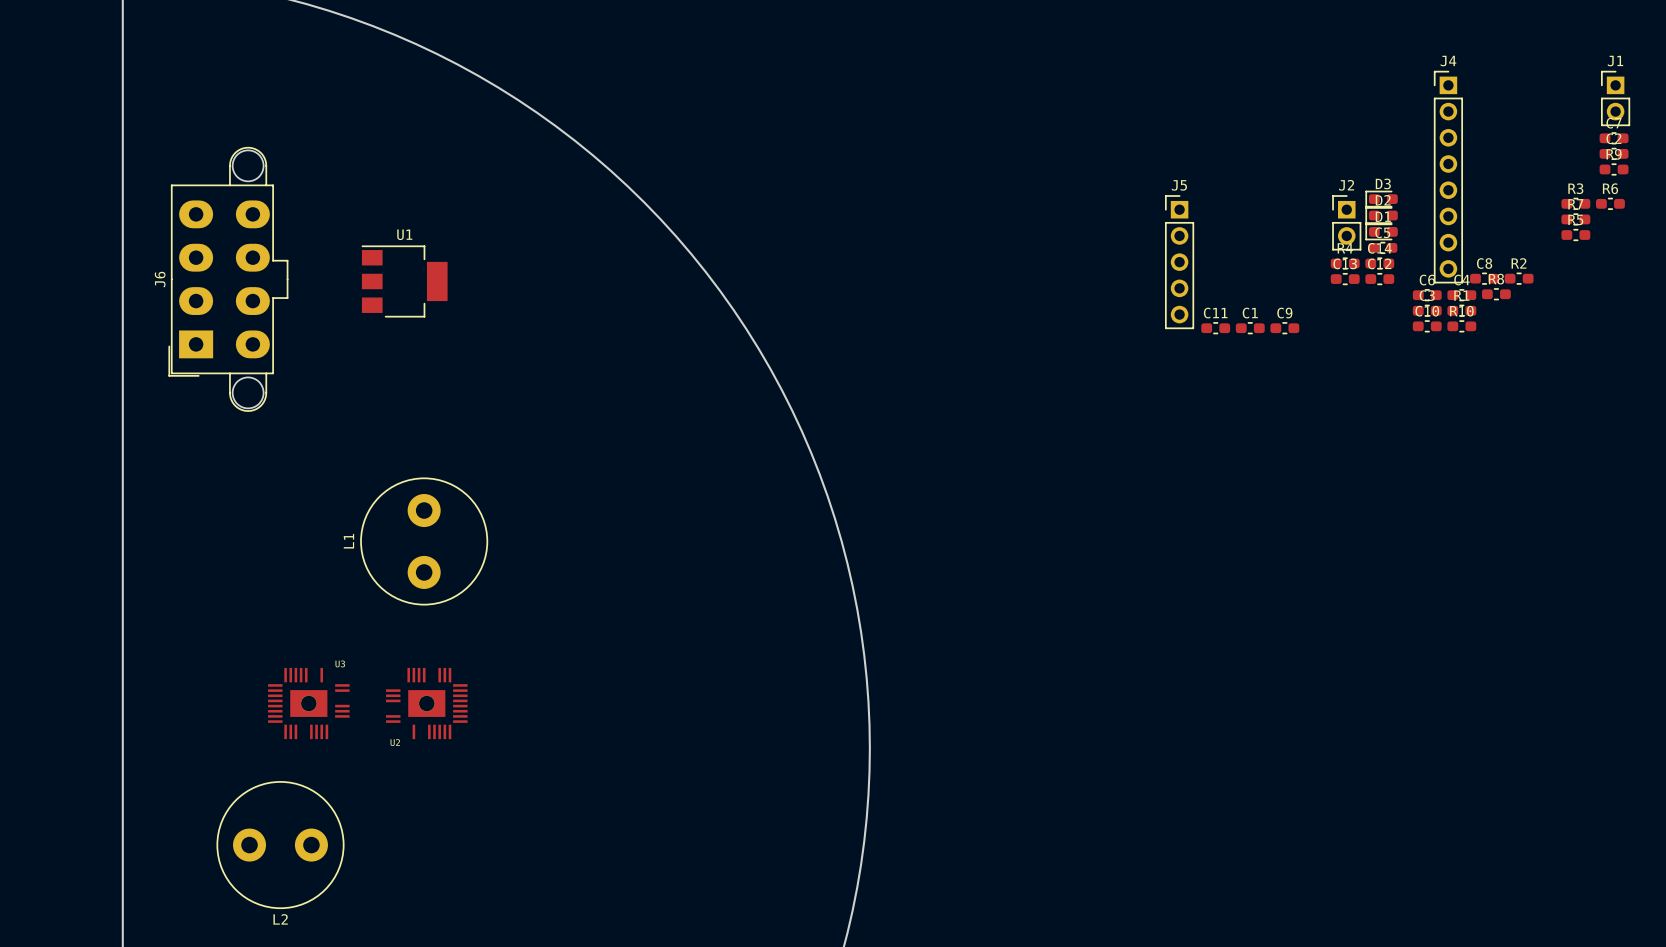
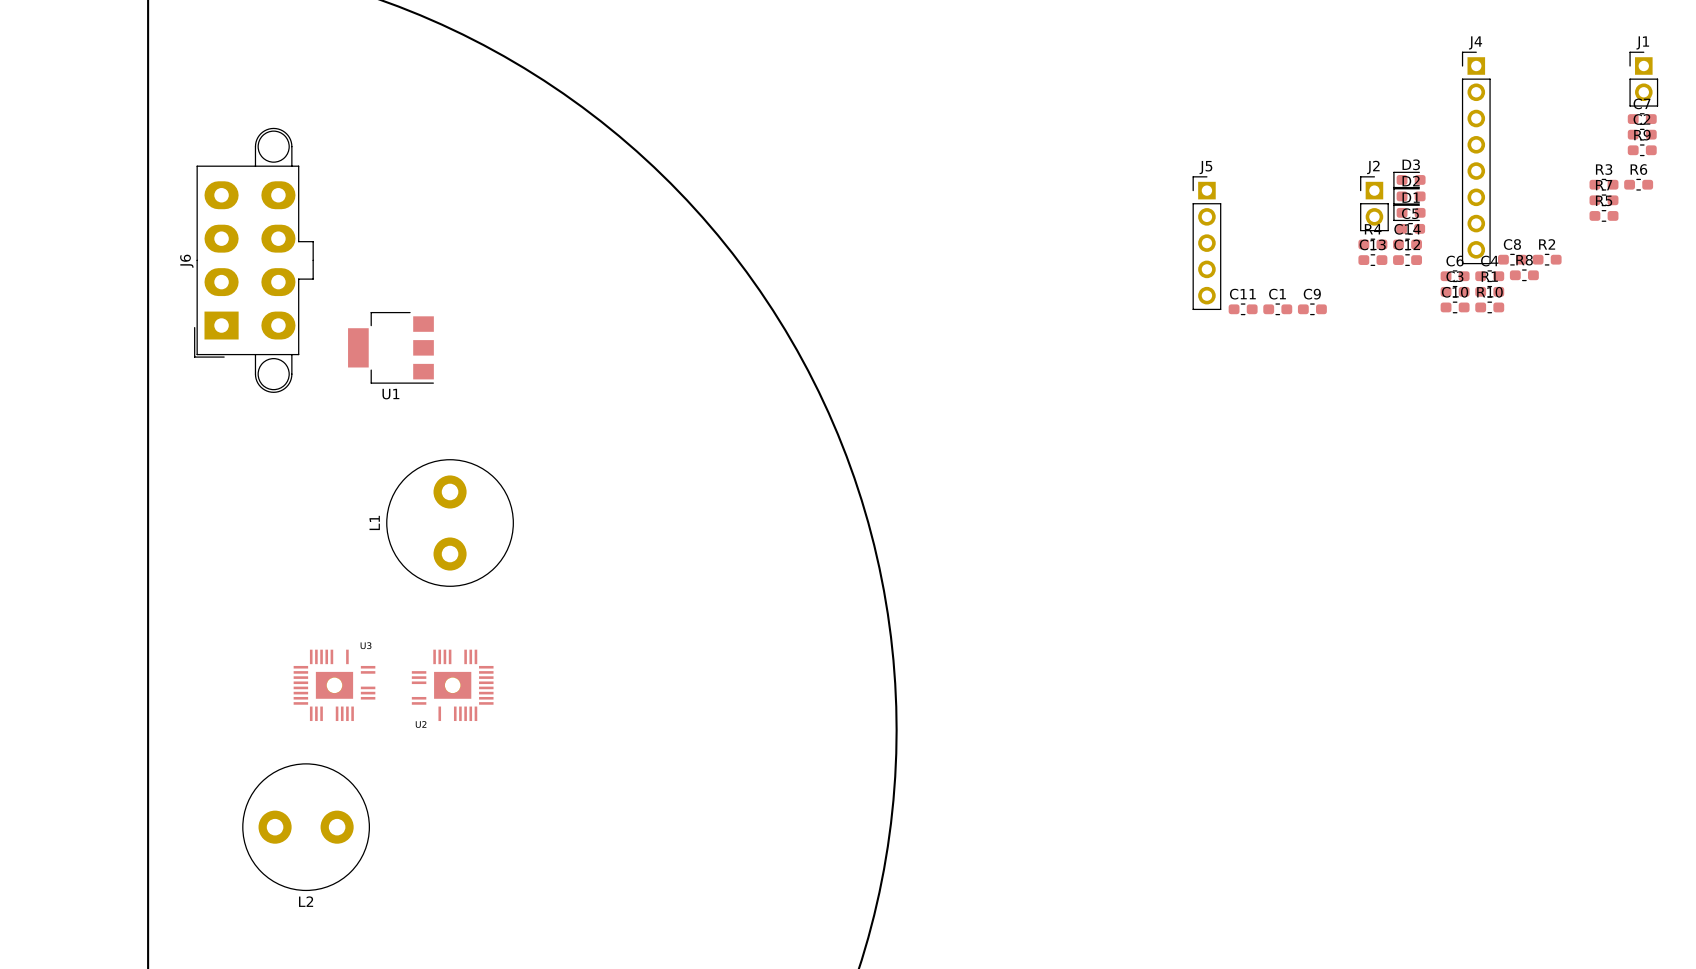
U1 rotation: 0° (404, 281) -> 180° (391, 347)
U1 position: (404, 281) -> (391, 347)

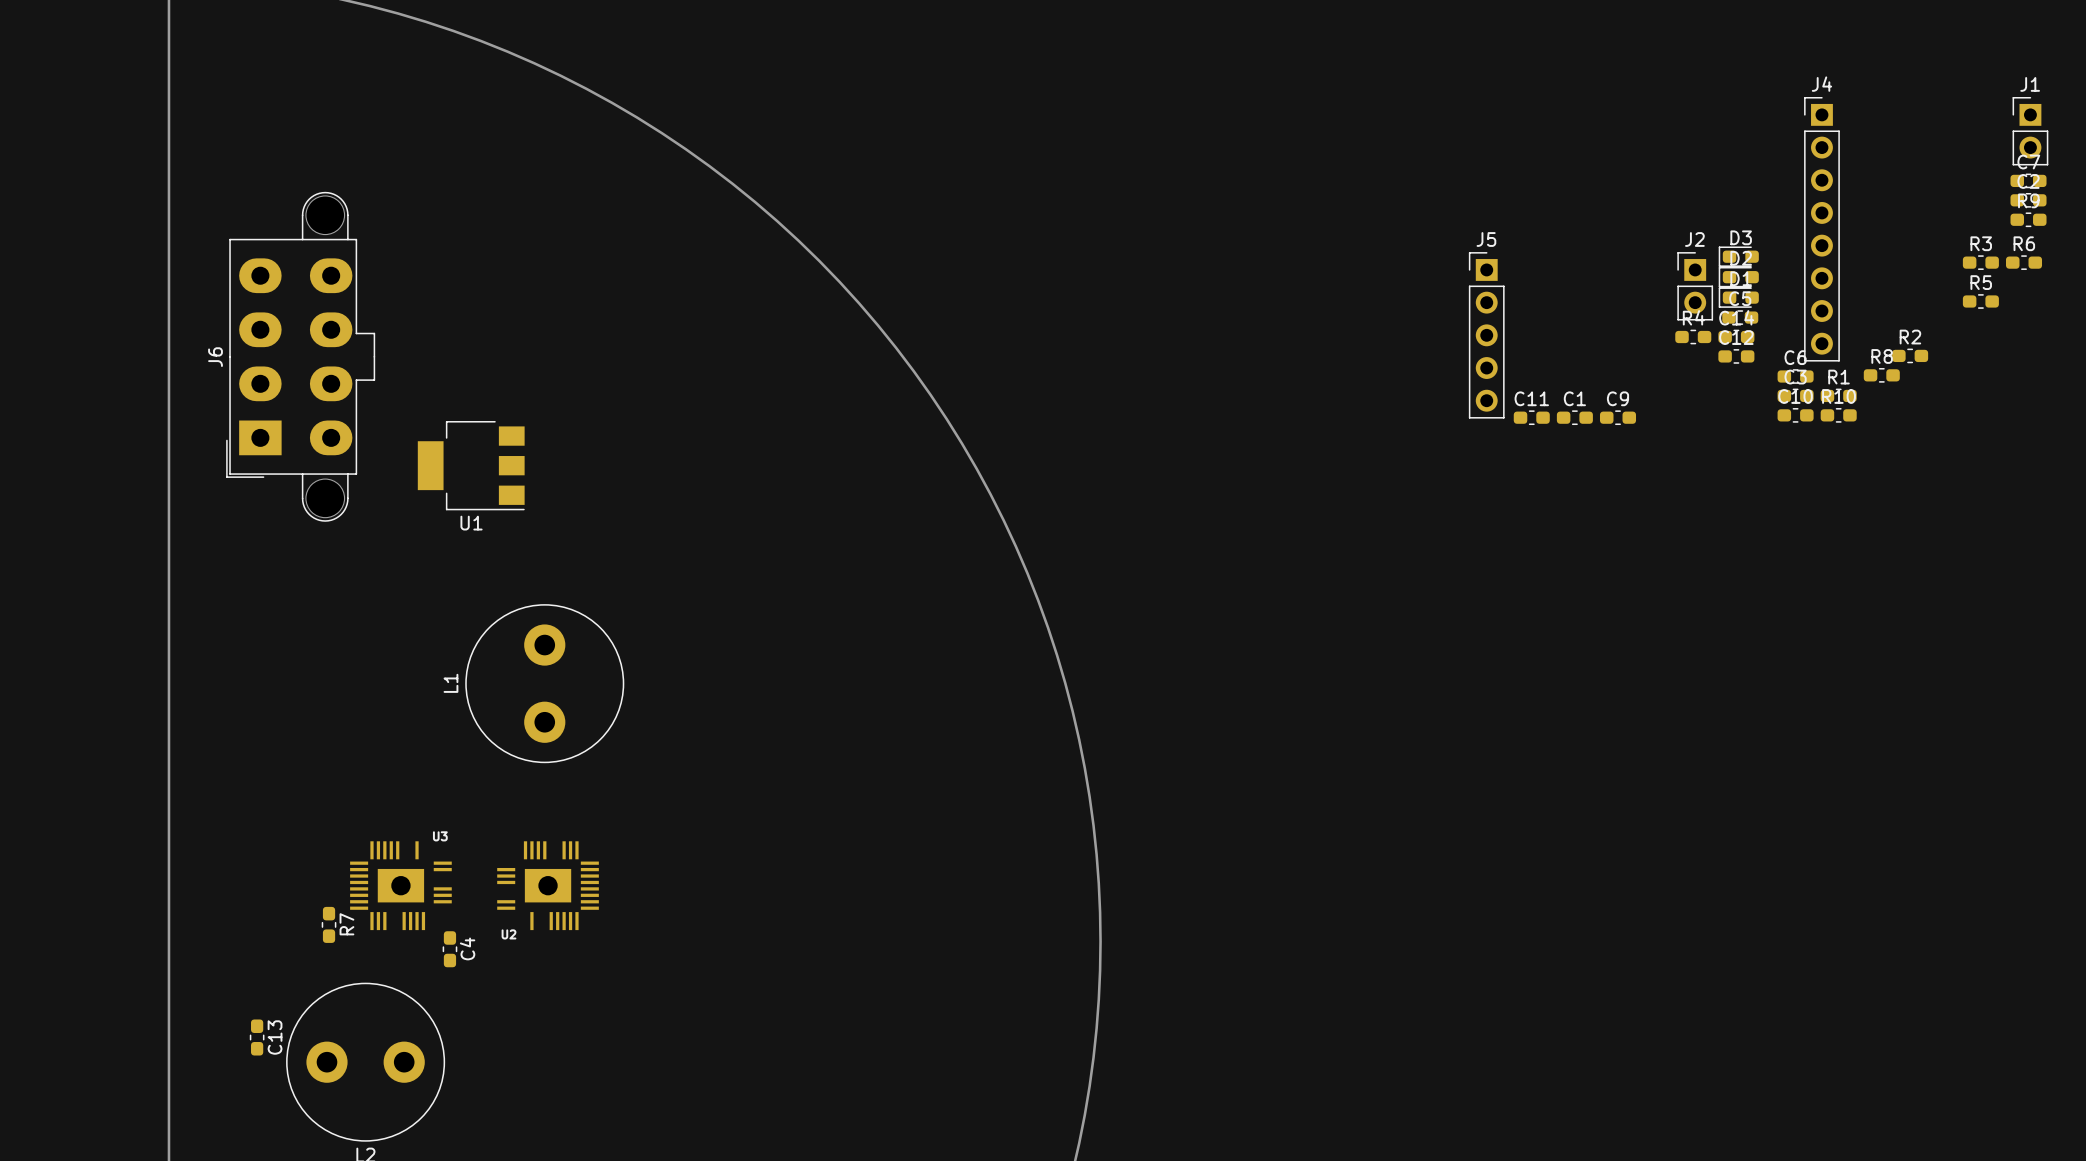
R7 rotation: 0° (1603, 200) -> 90° clockwise (329, 924)
R7 position: (1603, 200) -> (329, 924)
C8: (1512, 259) -> none
C13 rotation: 0° (1372, 260) -> 90° clockwise (257, 1037)
C13 position: (1372, 260) -> (257, 1037)
C4 rotation: 0° (1489, 276) -> 90° clockwise (449, 949)
C4 position: (1489, 276) -> (449, 949)

